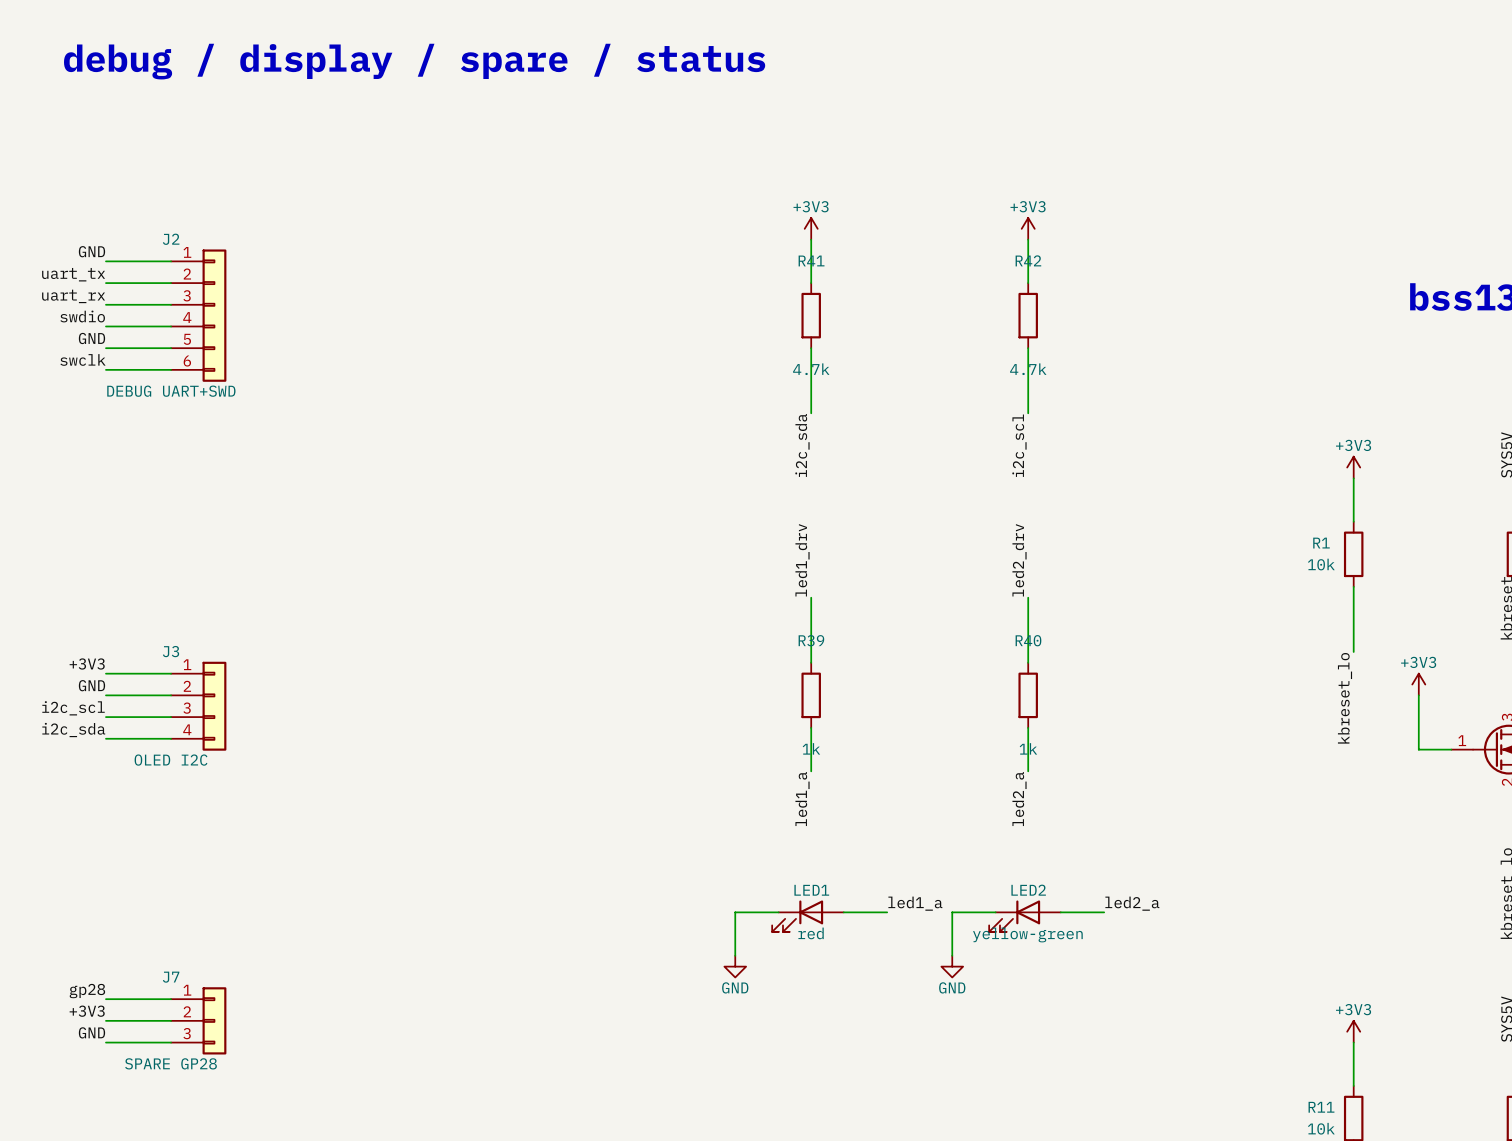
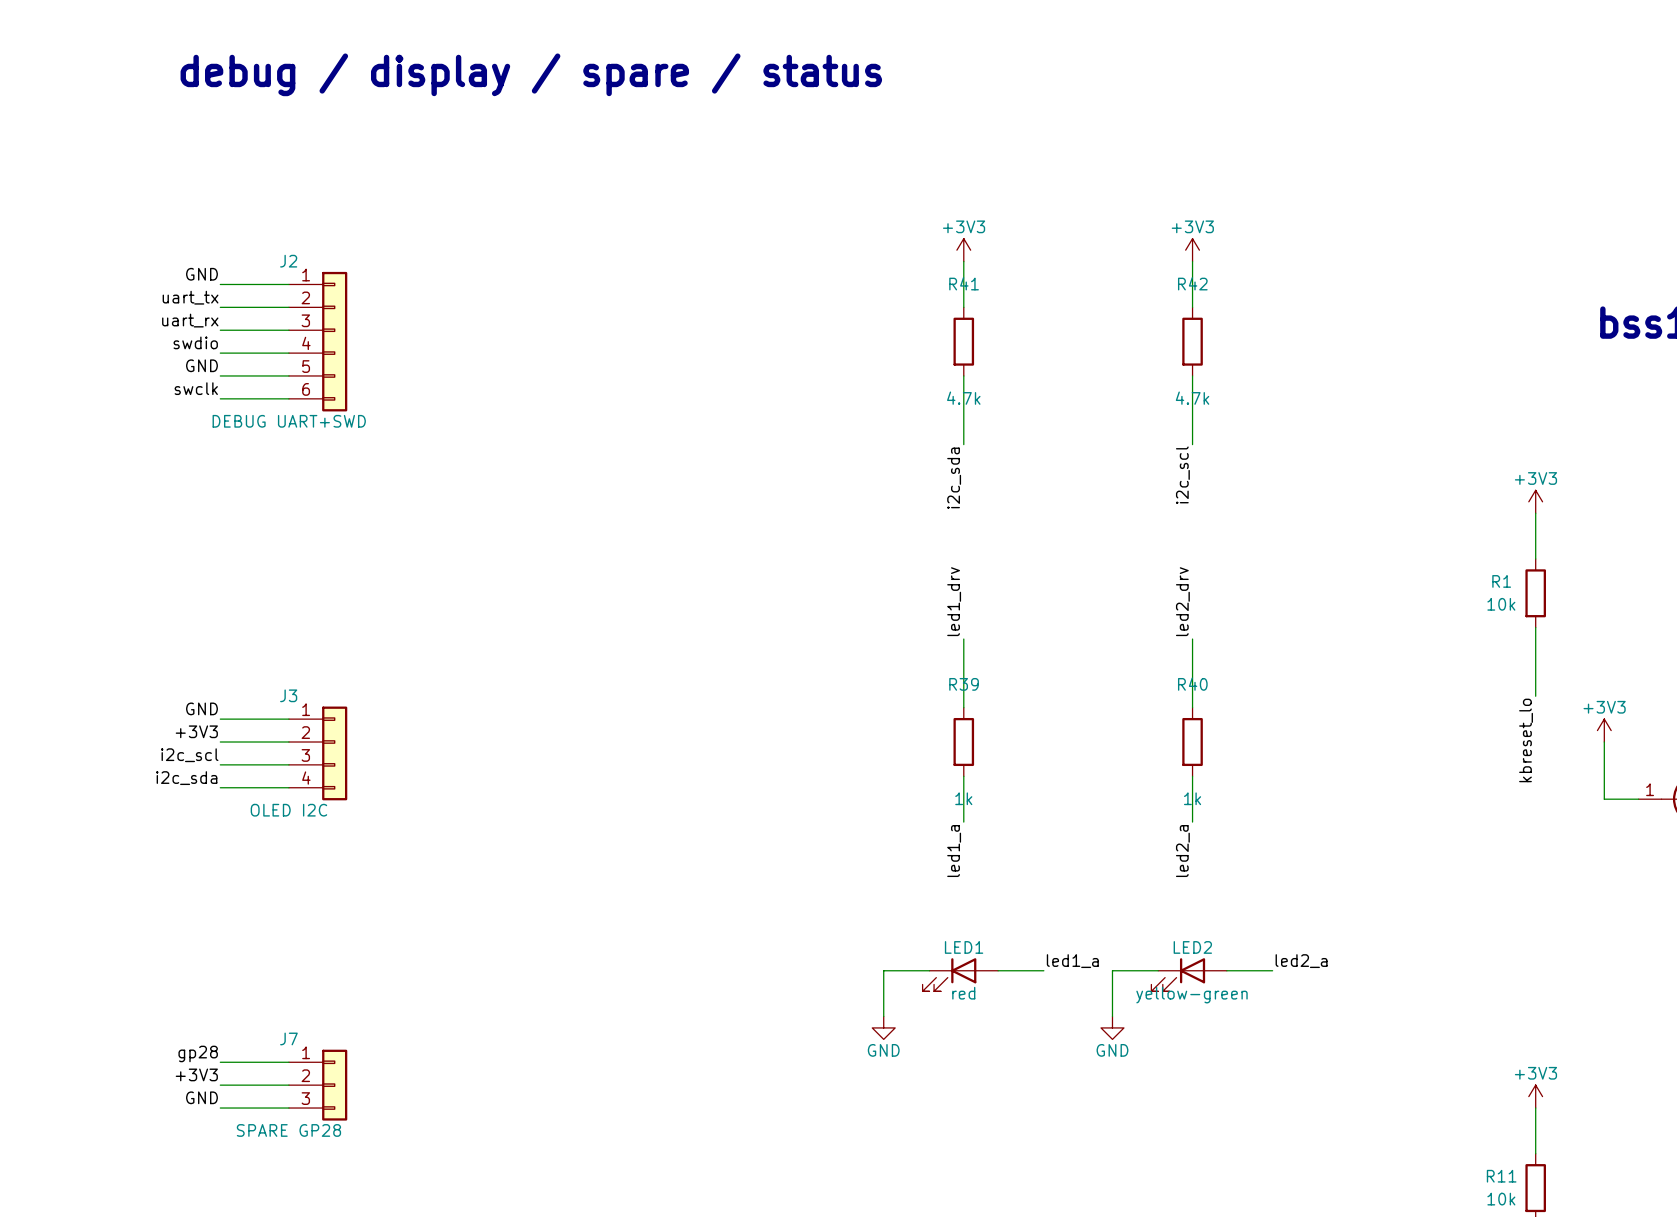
label: +3V3 (87, 663) -> GND (201, 708)
label: GND (91, 685) -> +3V3 (196, 731)

